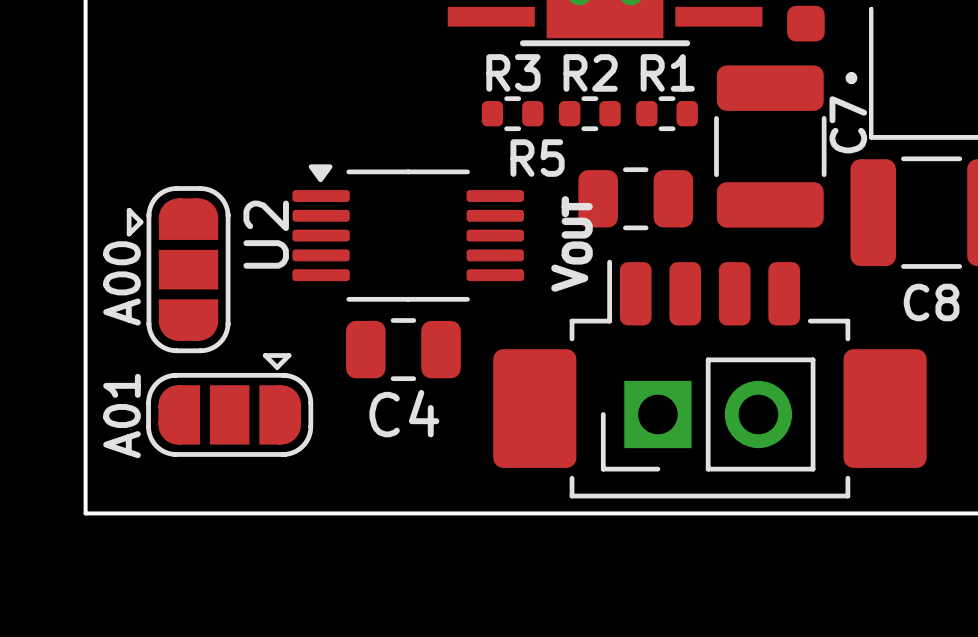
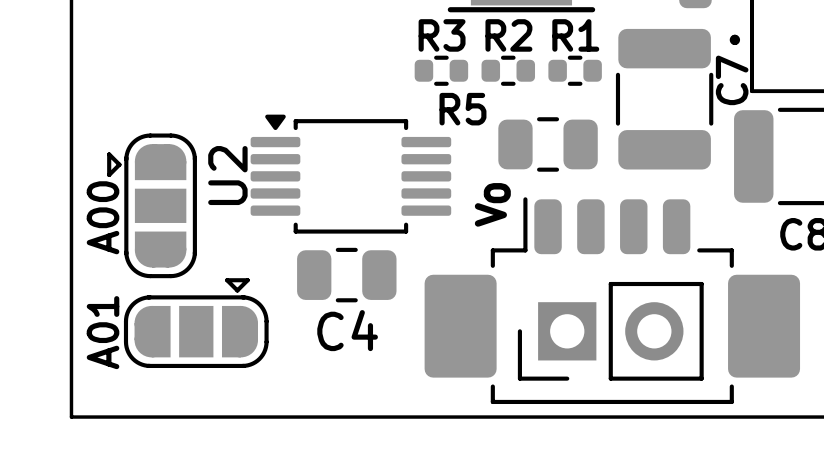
U2 footprint: [292, 164, 524, 302] -> [250, 114, 452, 234]
text: VOUT (572, 243) -> VO (492, 204)

